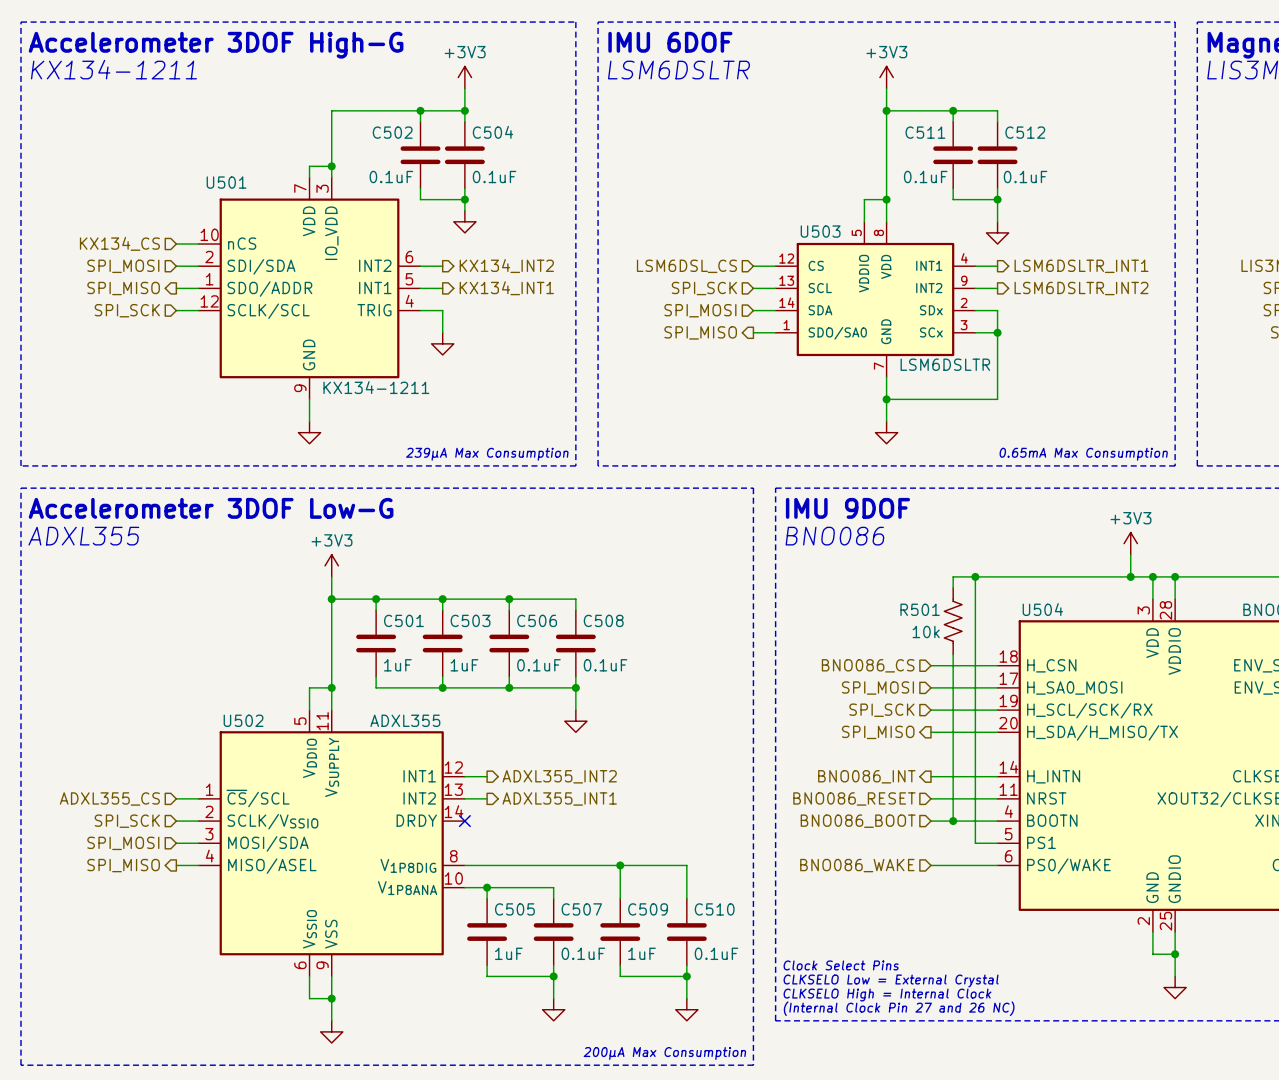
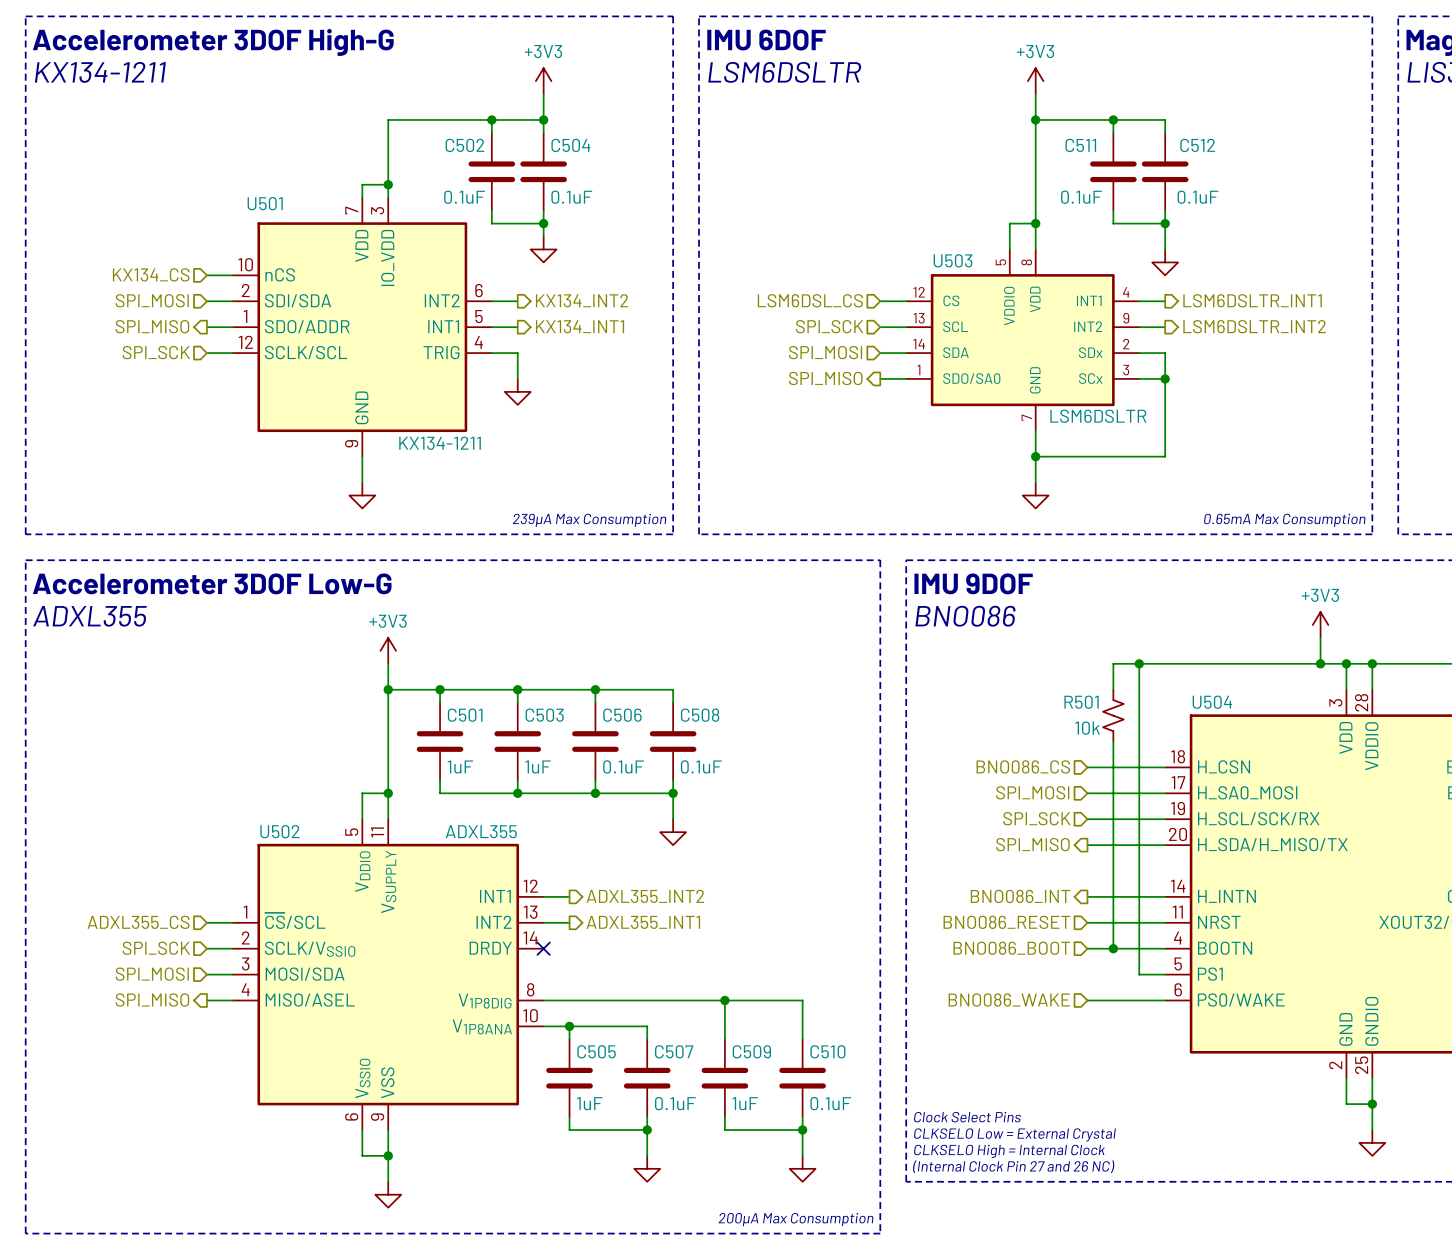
R501 symbol: [944, 588, 963, 655] -> [1103, 689, 1124, 742]

